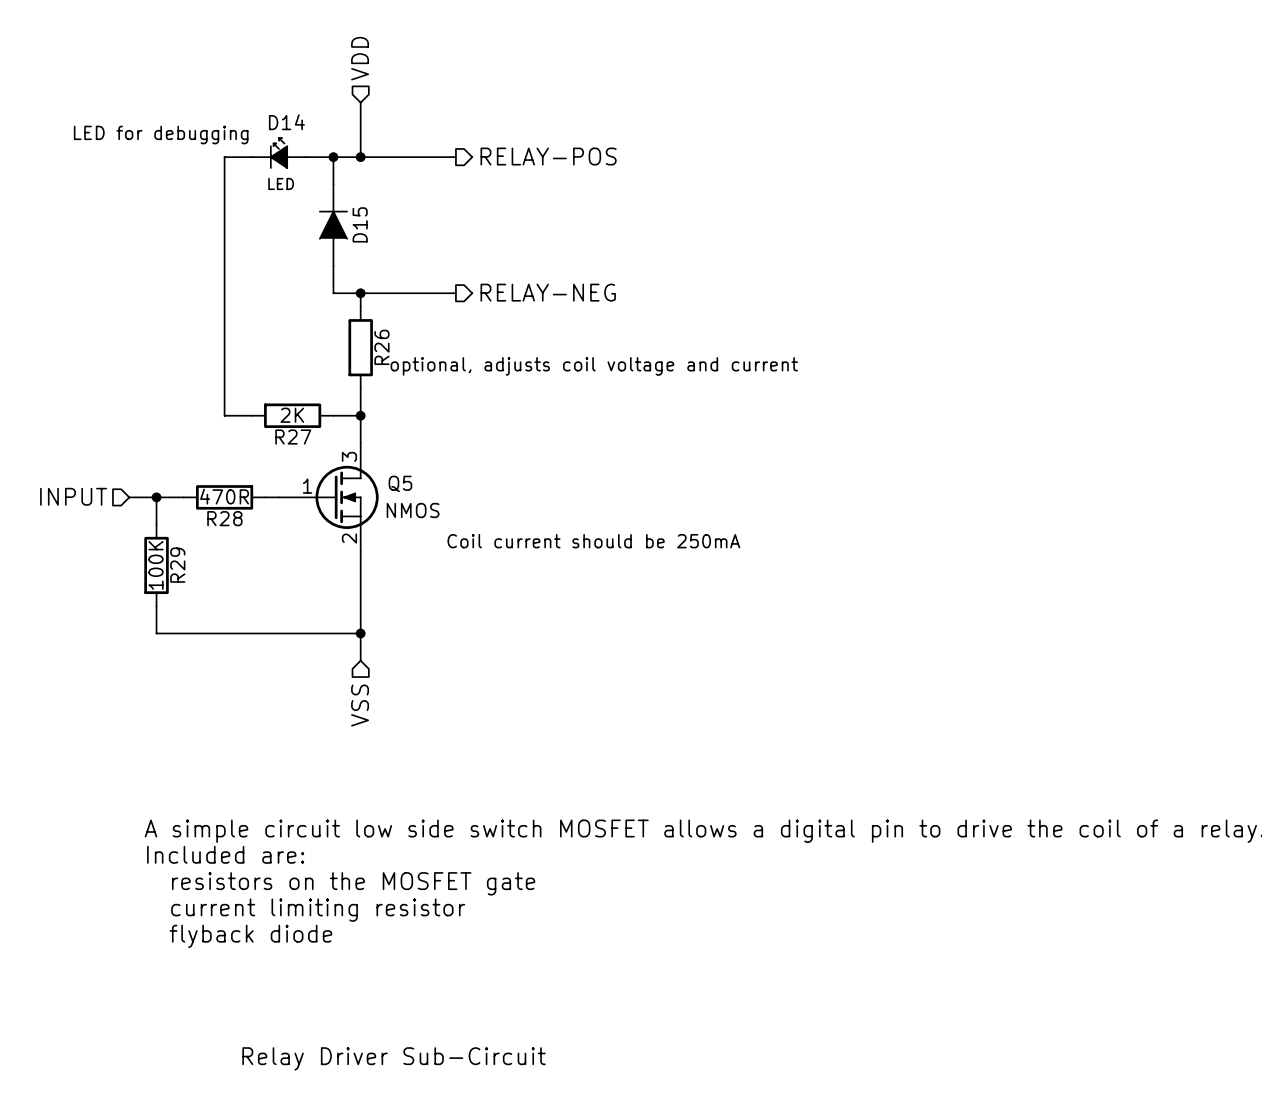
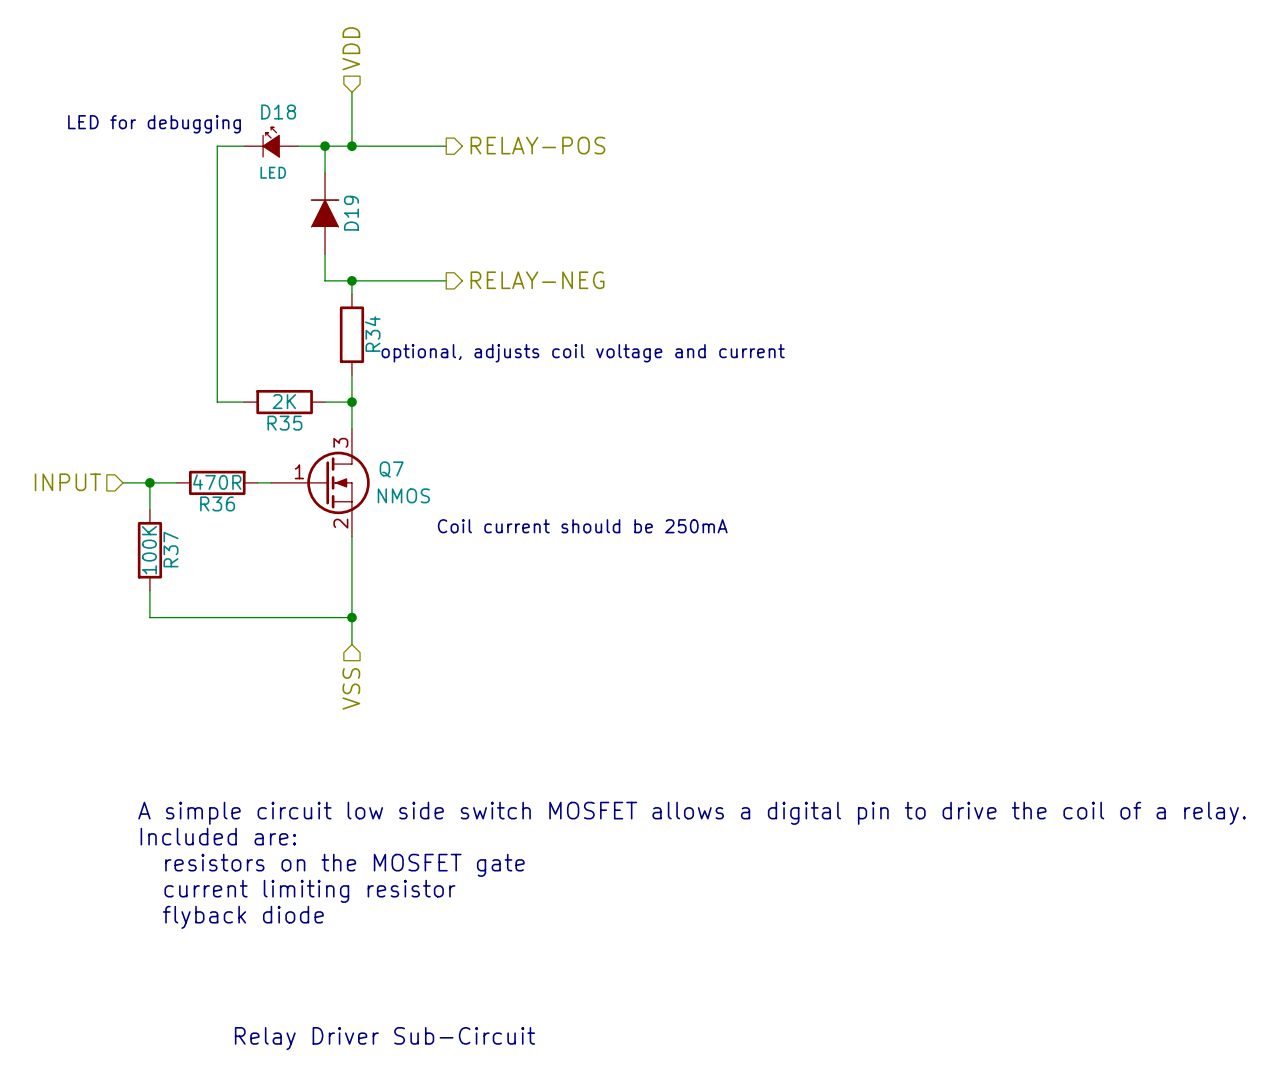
D14 name: D14 (286, 122) -> D18 (278, 112)
D15 name: D15 (360, 224) -> D19 (351, 213)
R26 name: R26 (381, 347) -> R34 (372, 334)
R27 name: R27 (293, 437) -> R35 (284, 423)
Q5 name: Q5 (400, 483) -> Q7 (391, 469)
R28 name: R28 (224, 518) -> R36 (217, 503)
R29 name: R29 (177, 565) -> R37 (170, 549)

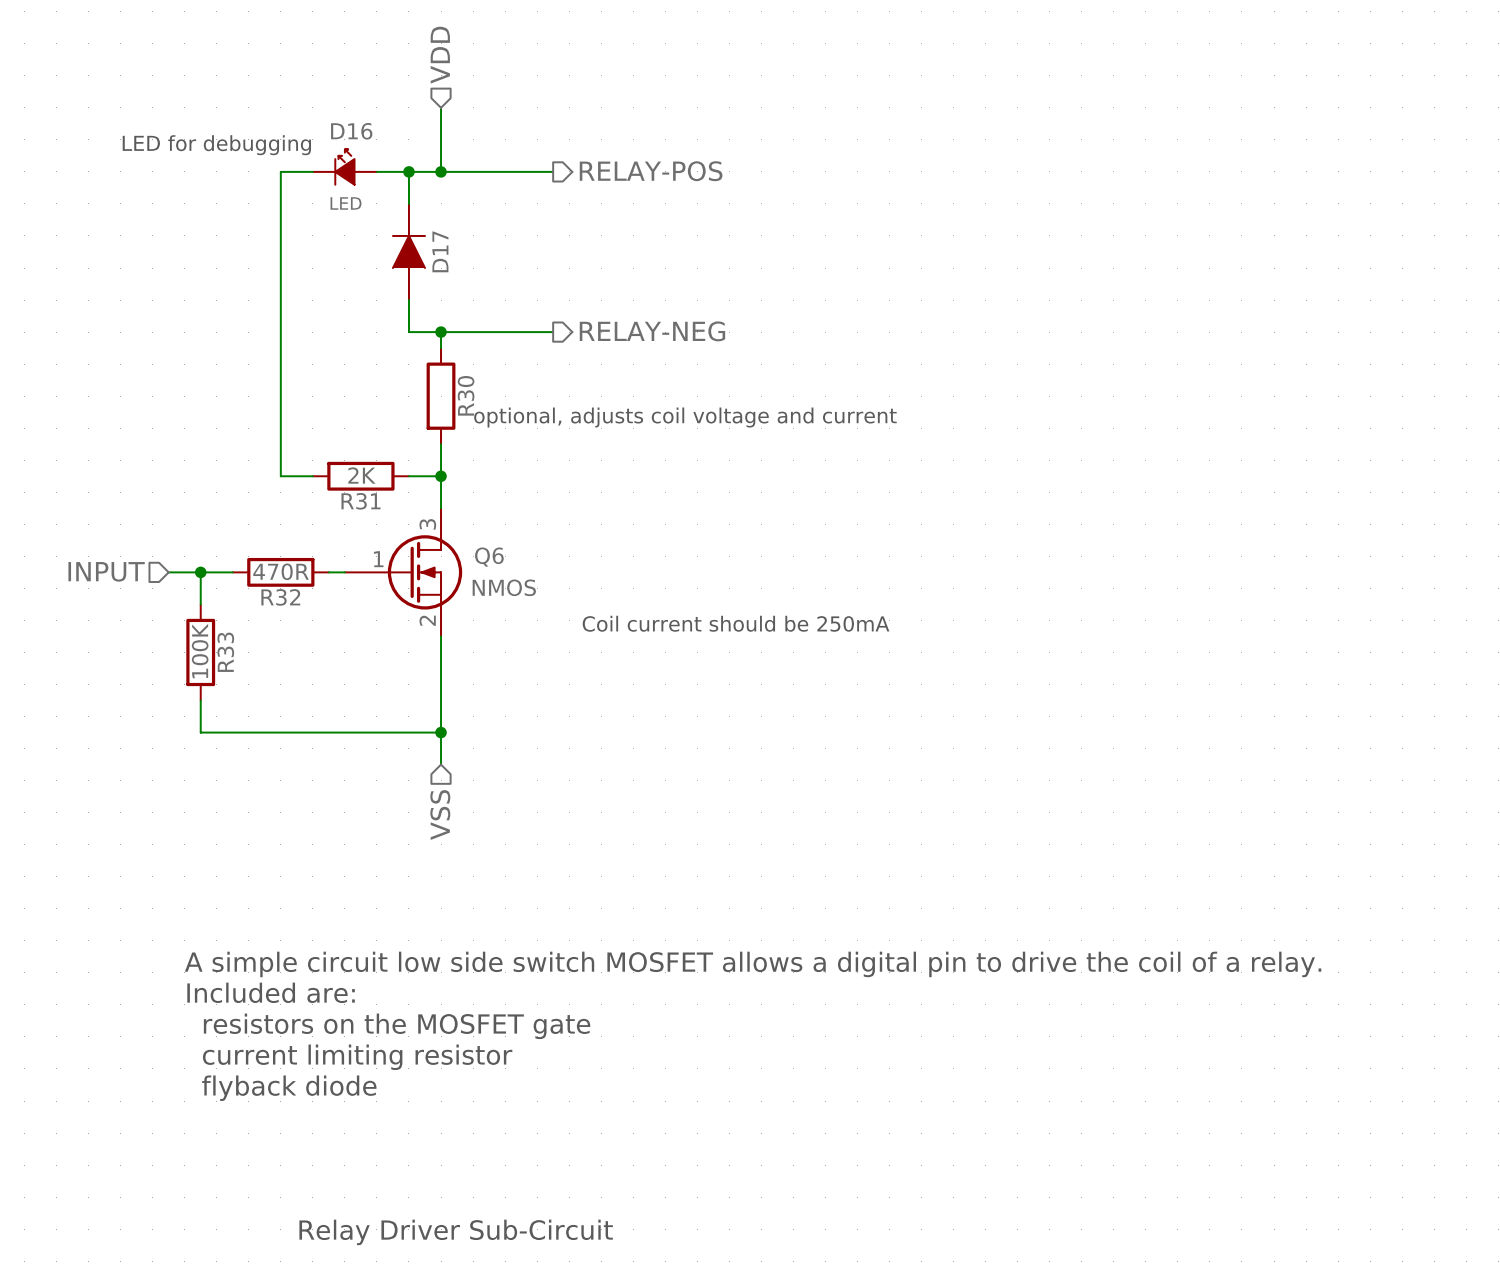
D18 name: D18 (278, 112) -> D16 (351, 131)
D19 name: D19 (351, 213) -> D17 (440, 251)
R34 name: R34 (372, 334) -> R30 (466, 395)
R35 name: R35 (284, 423) -> R31 (360, 501)
Q7 name: Q7 (391, 469) -> Q6 (489, 557)
R36 name: R36 (217, 503) -> R32 (280, 597)
R37 name: R37 (170, 549) -> R33 (225, 652)

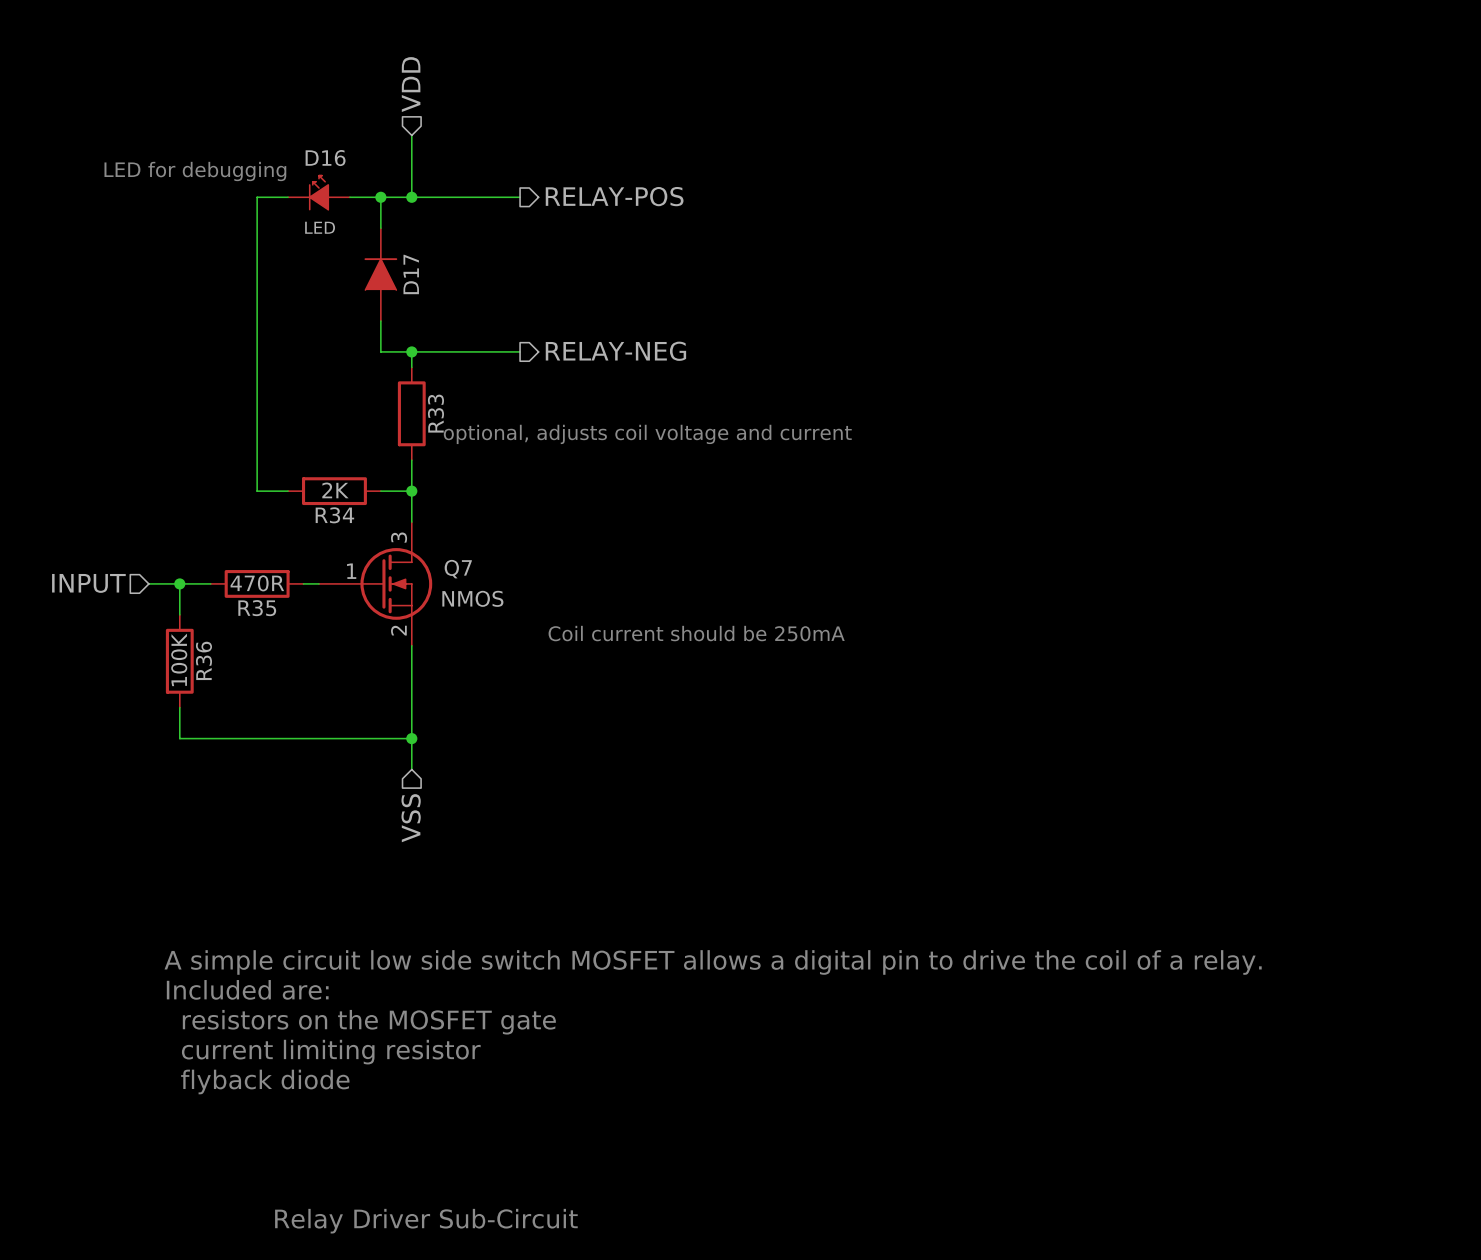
R30 name: R30 (466, 395) -> R33 (435, 413)
R31 name: R31 (360, 501) -> R34 (334, 515)
Q6 name: Q6 (489, 557) -> Q7 (458, 569)
R32 name: R32 (280, 597) -> R35 (257, 608)
R33 name: R33 (225, 652) -> R36 (203, 660)

